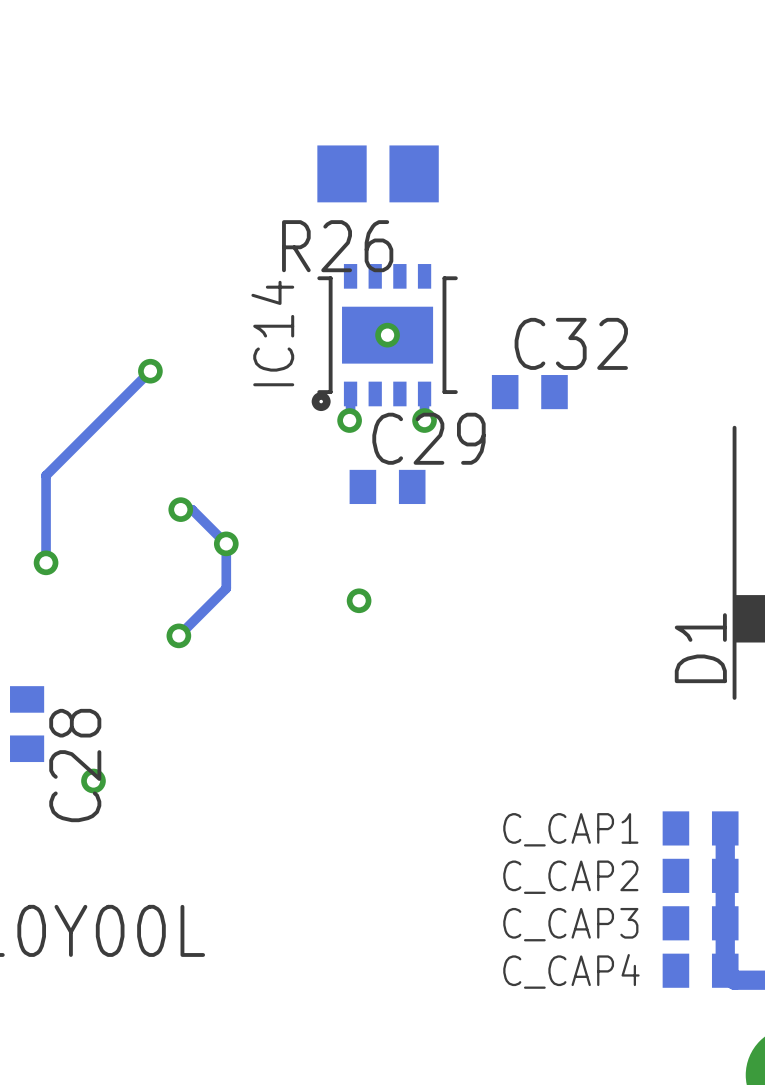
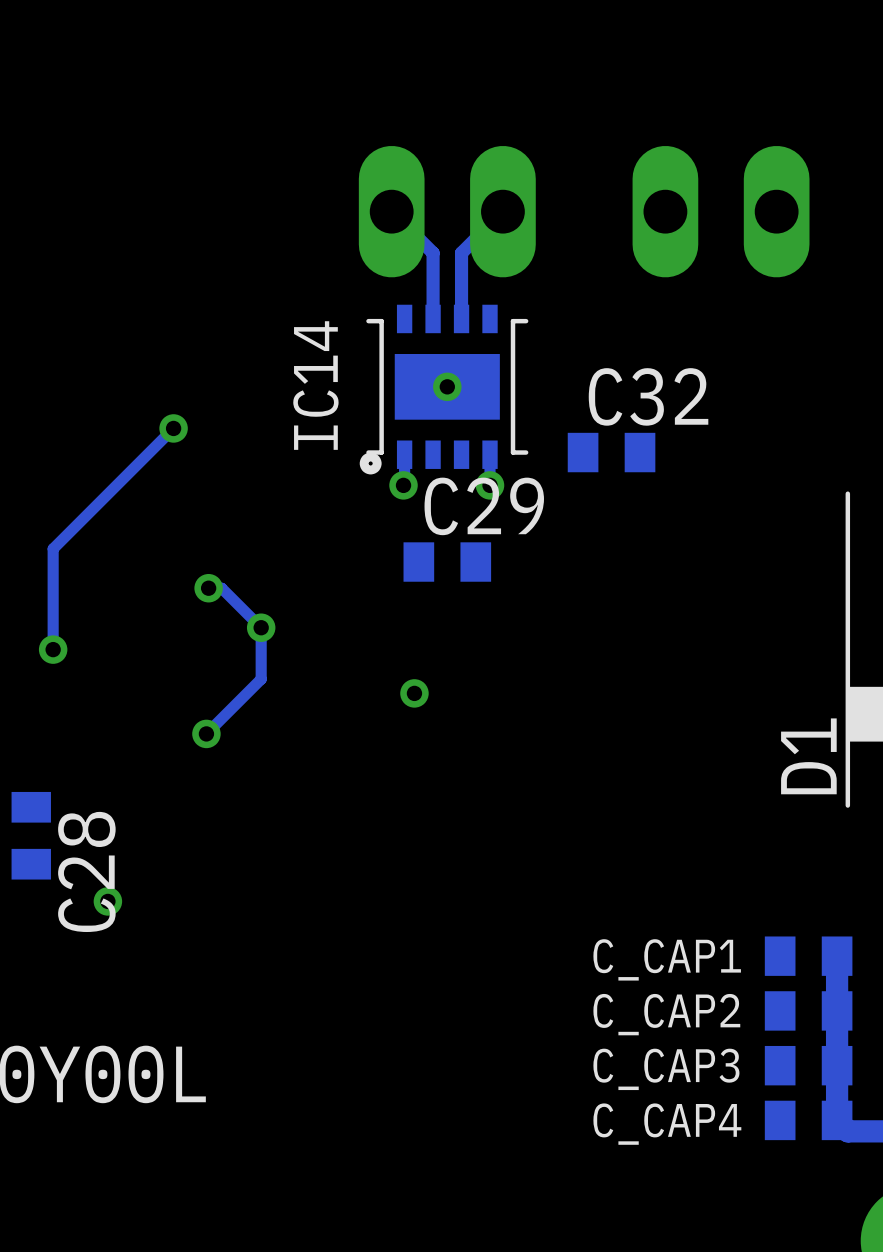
R26: (378, 173) -> none
track: none -> (391, 211) (433, 253) (433, 318)
part: none -> (447, 211)
track: none -> (502, 211) (461, 253) (461, 318)
part: none -> (721, 211)

